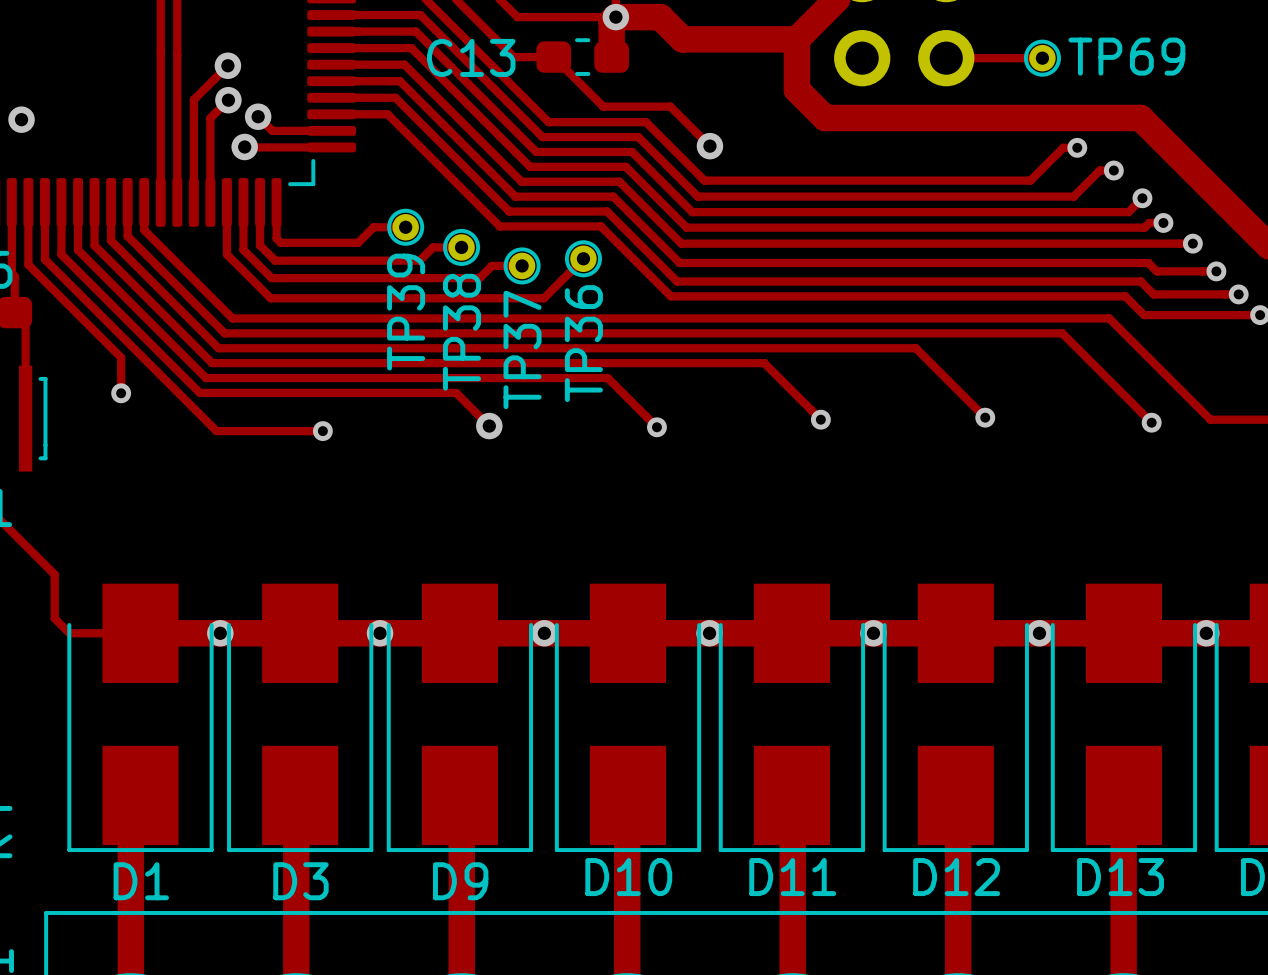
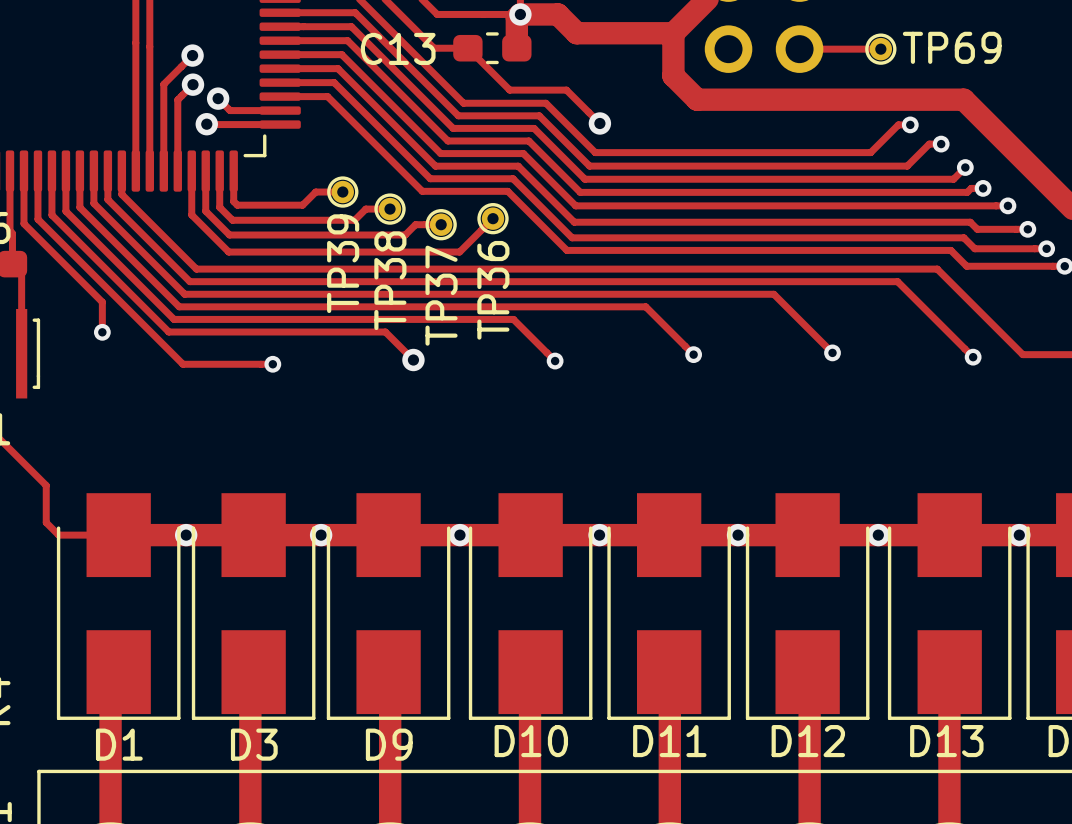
via: (21, 119) -> none

